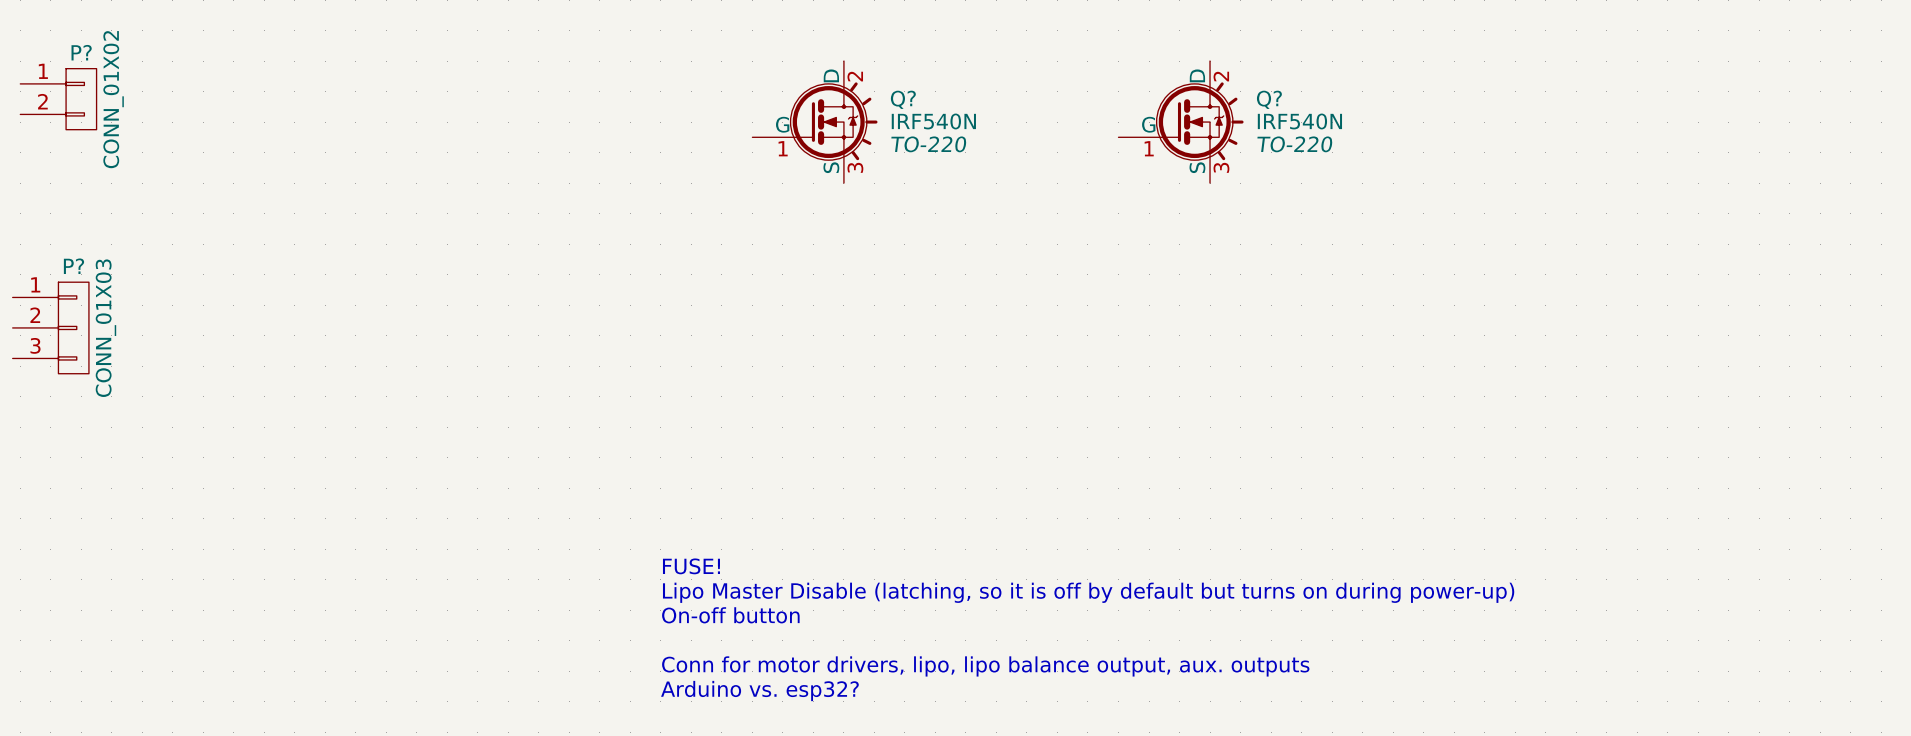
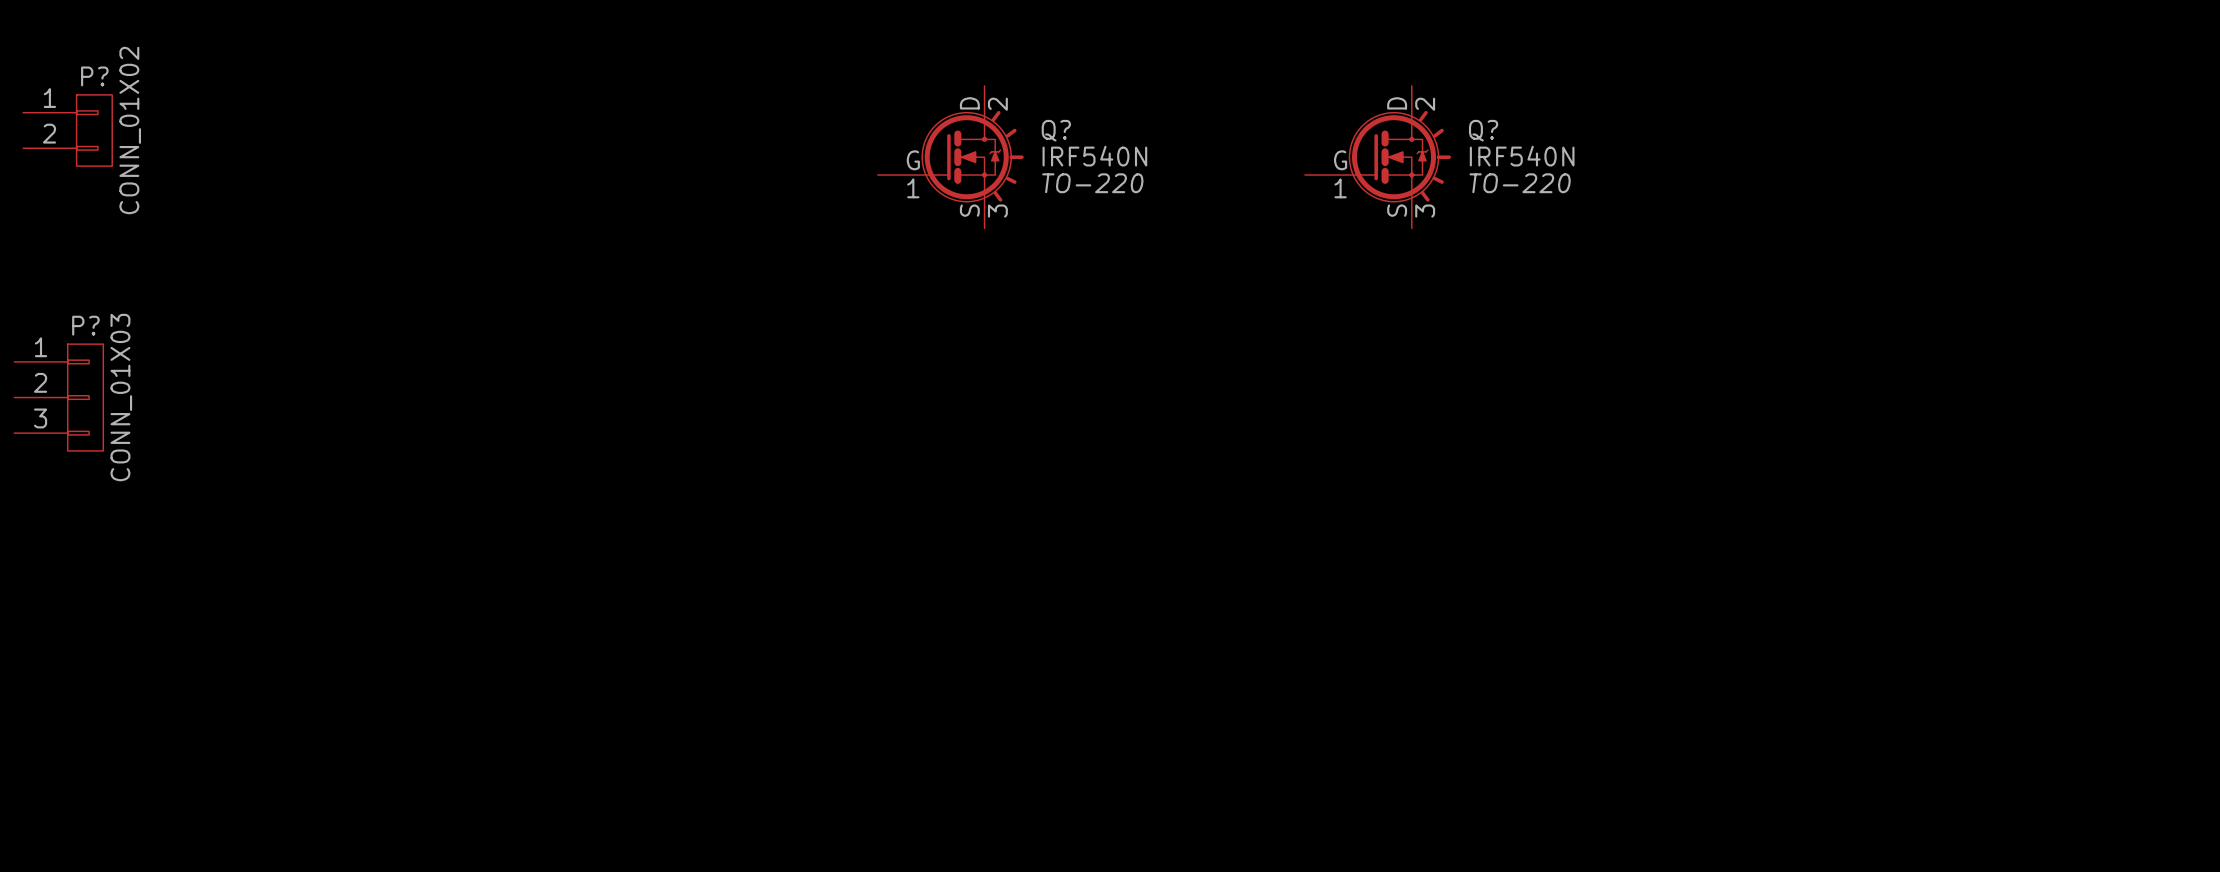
text: FUSE! (691, 566) -> none
text: Lipo Master Disable (latching, so it is off by default but turns on during power-up) (1088, 592) -> none
text: On-off button (730, 615) -> none
text: Conn for motor drivers, lipo, lipo balance output, aux. outputs (985, 666) -> none
text: Arduino vs. esp32? (759, 691) -> none

